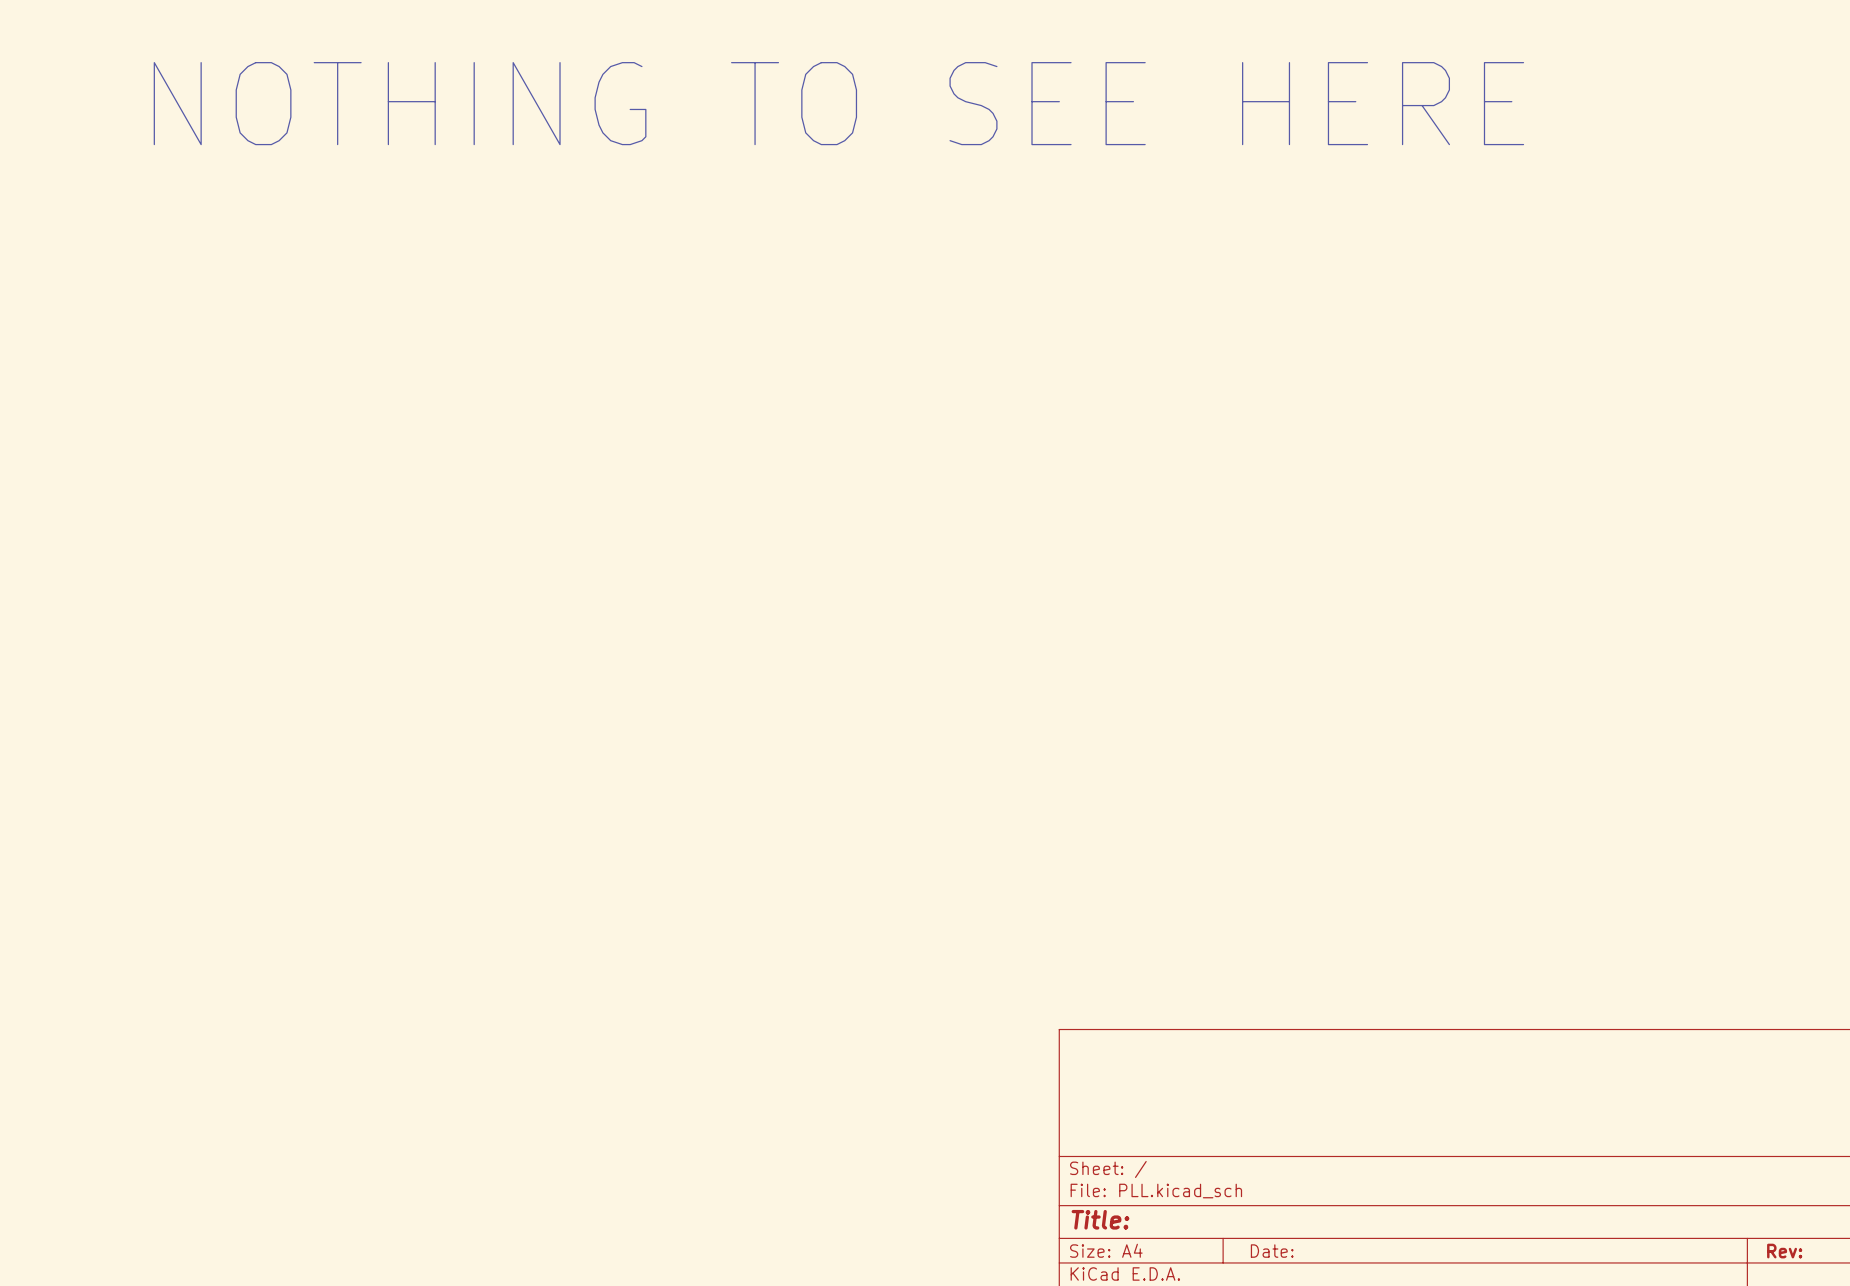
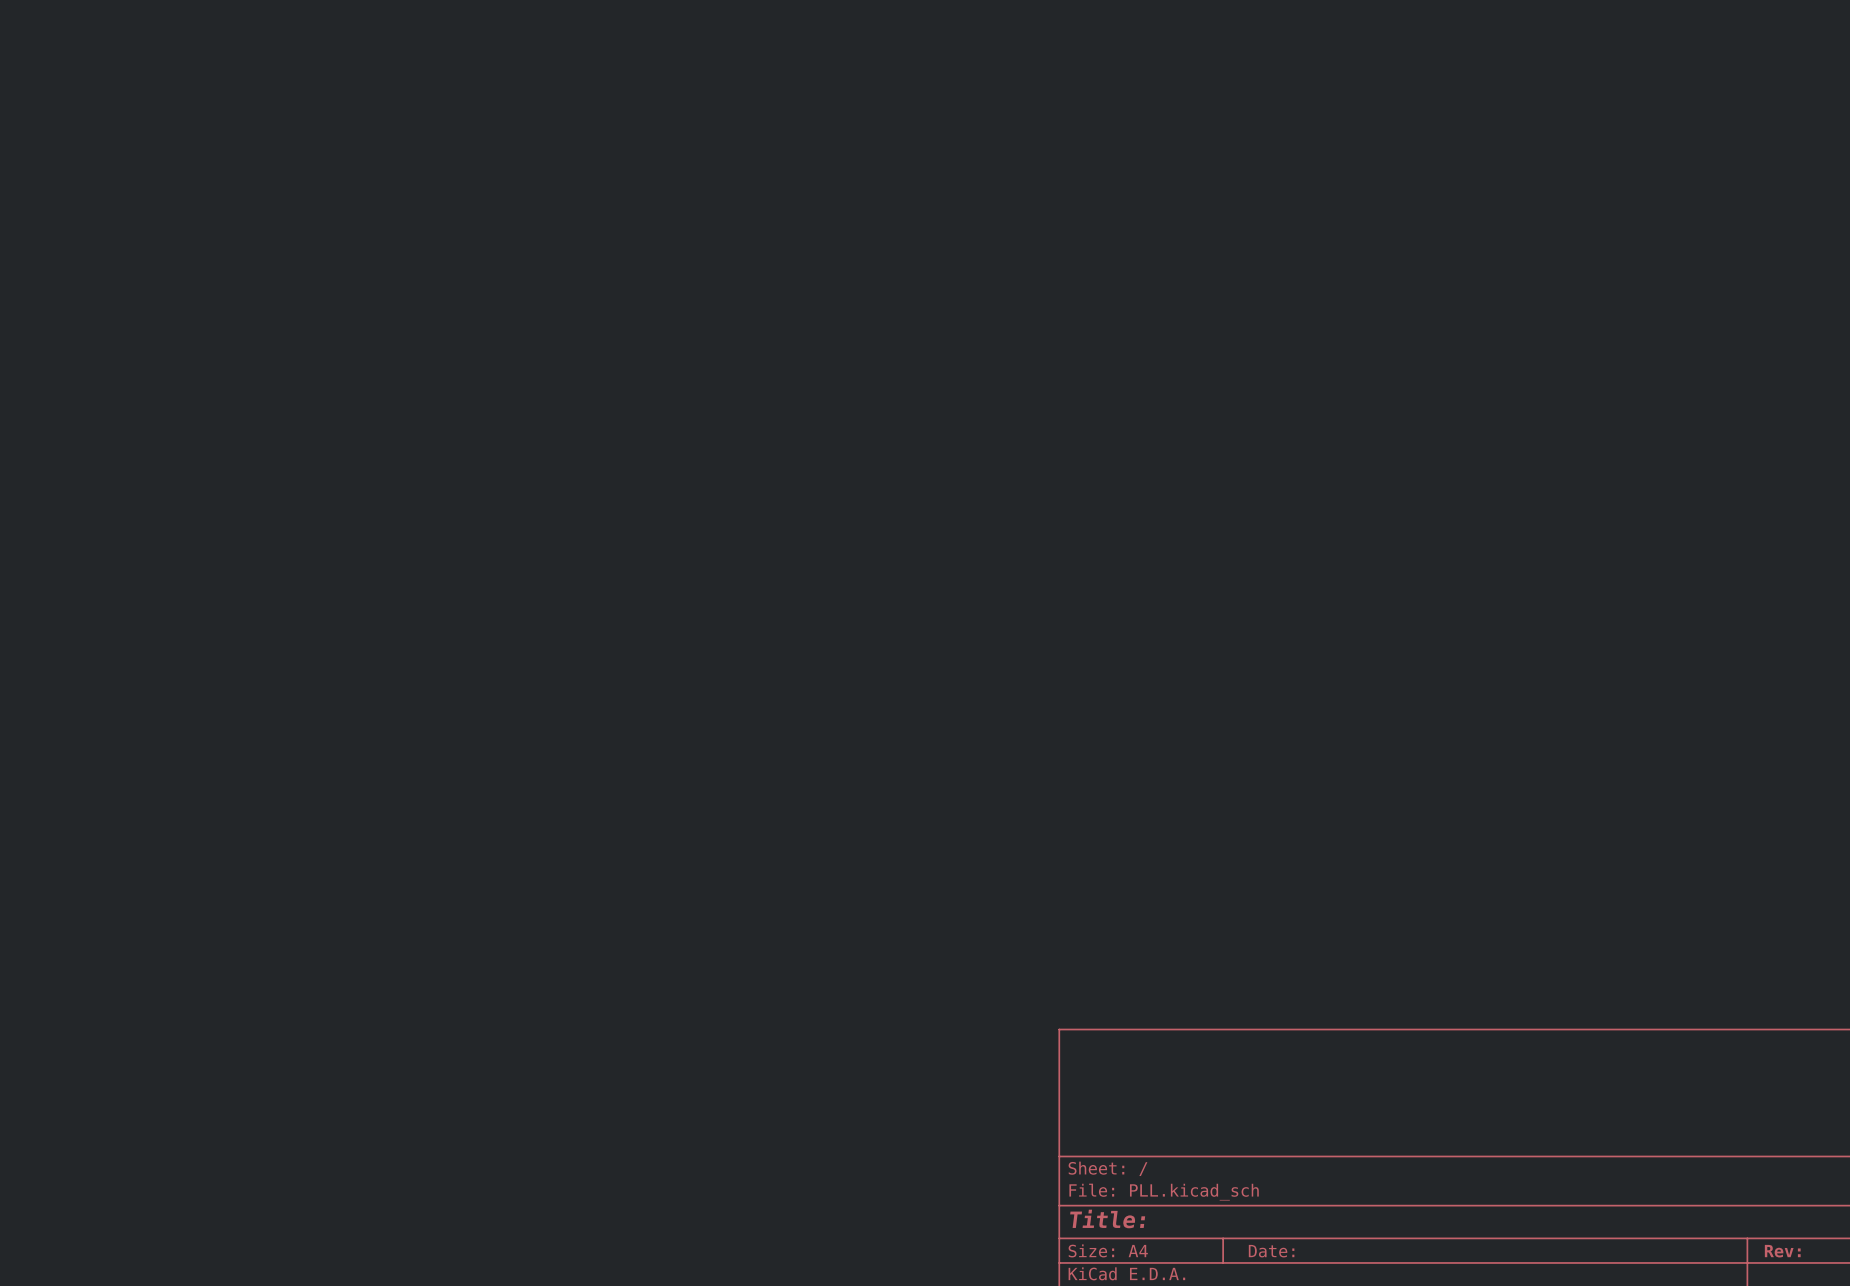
text: NOTHING TO SEE HERE (838, 103) -> none

